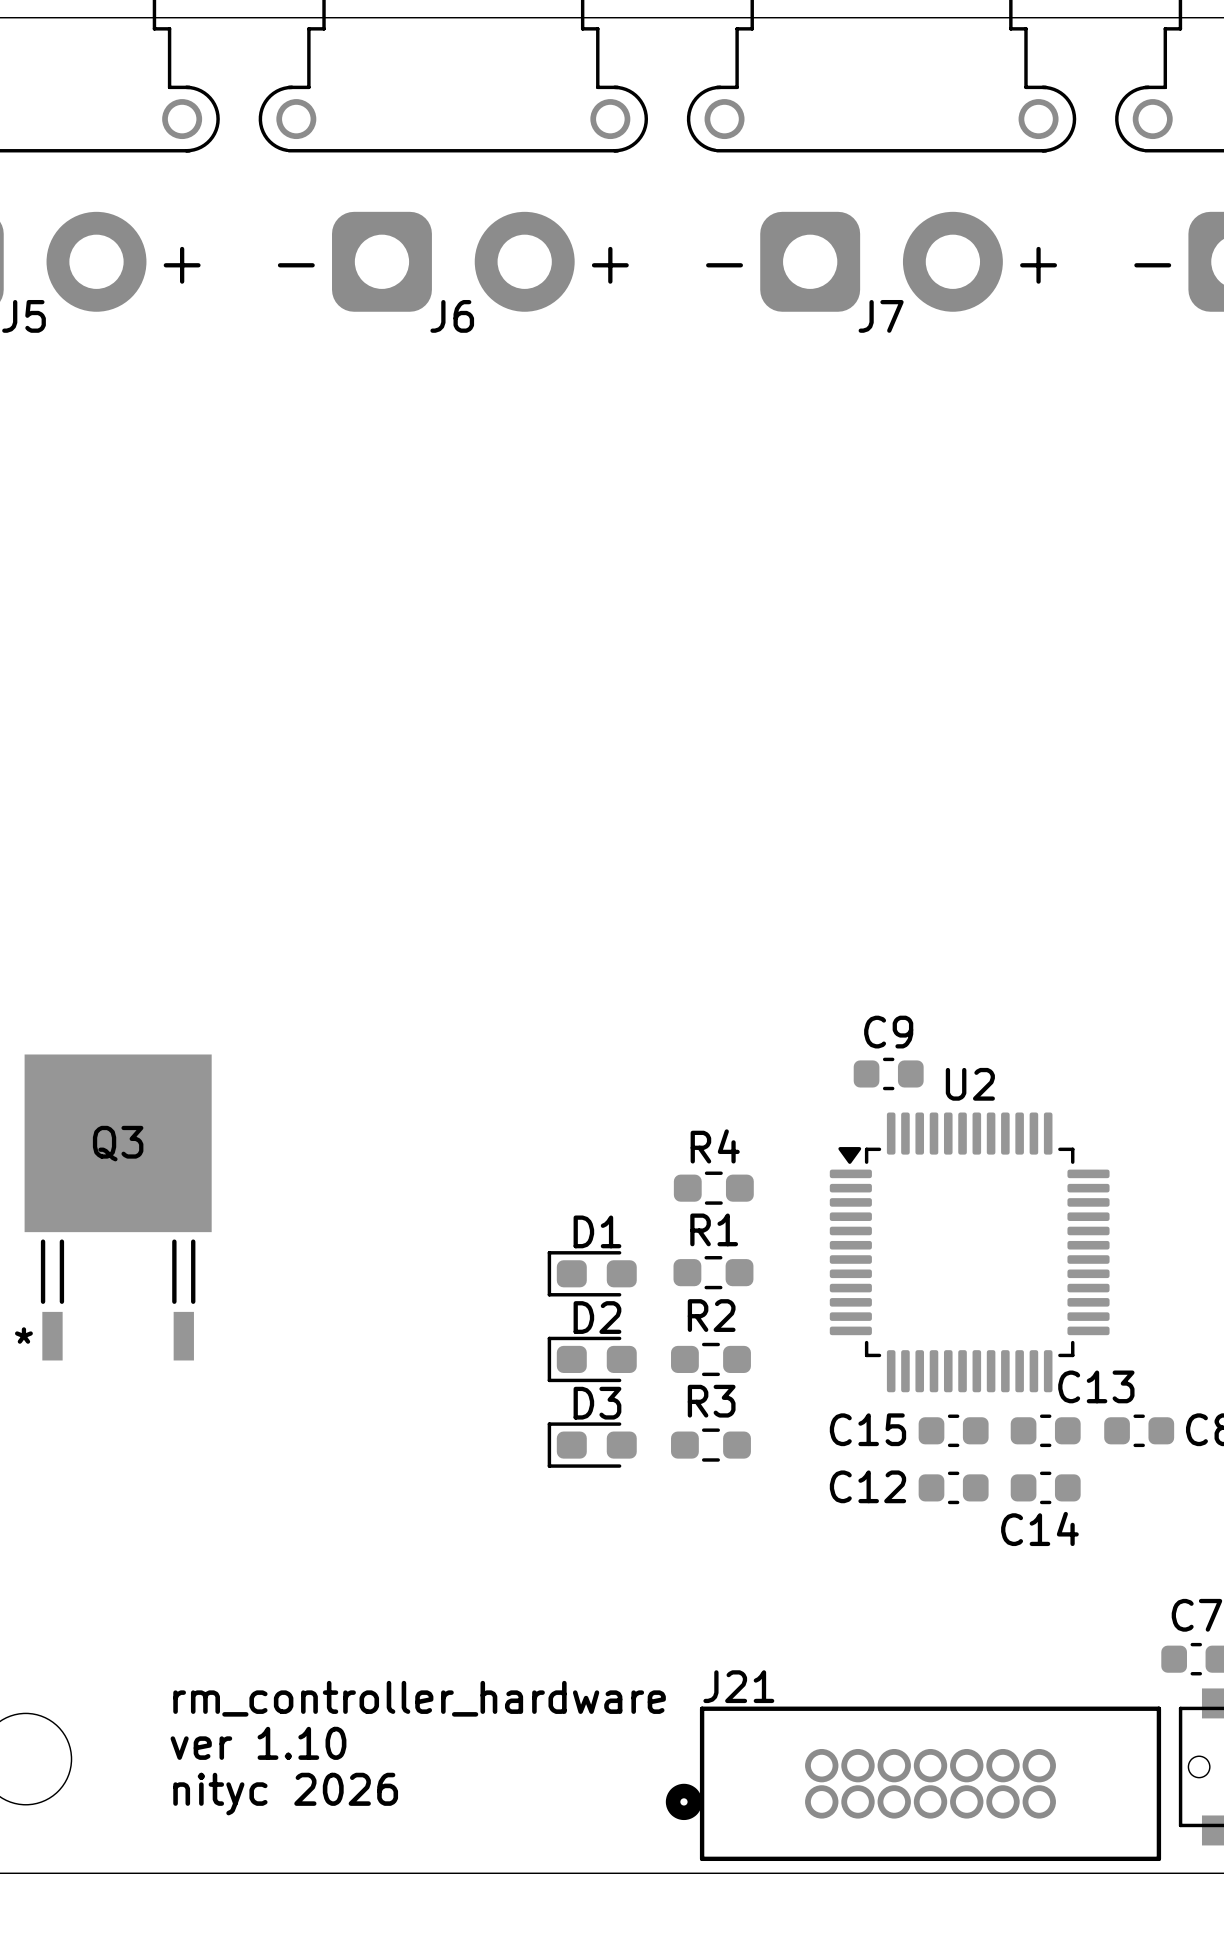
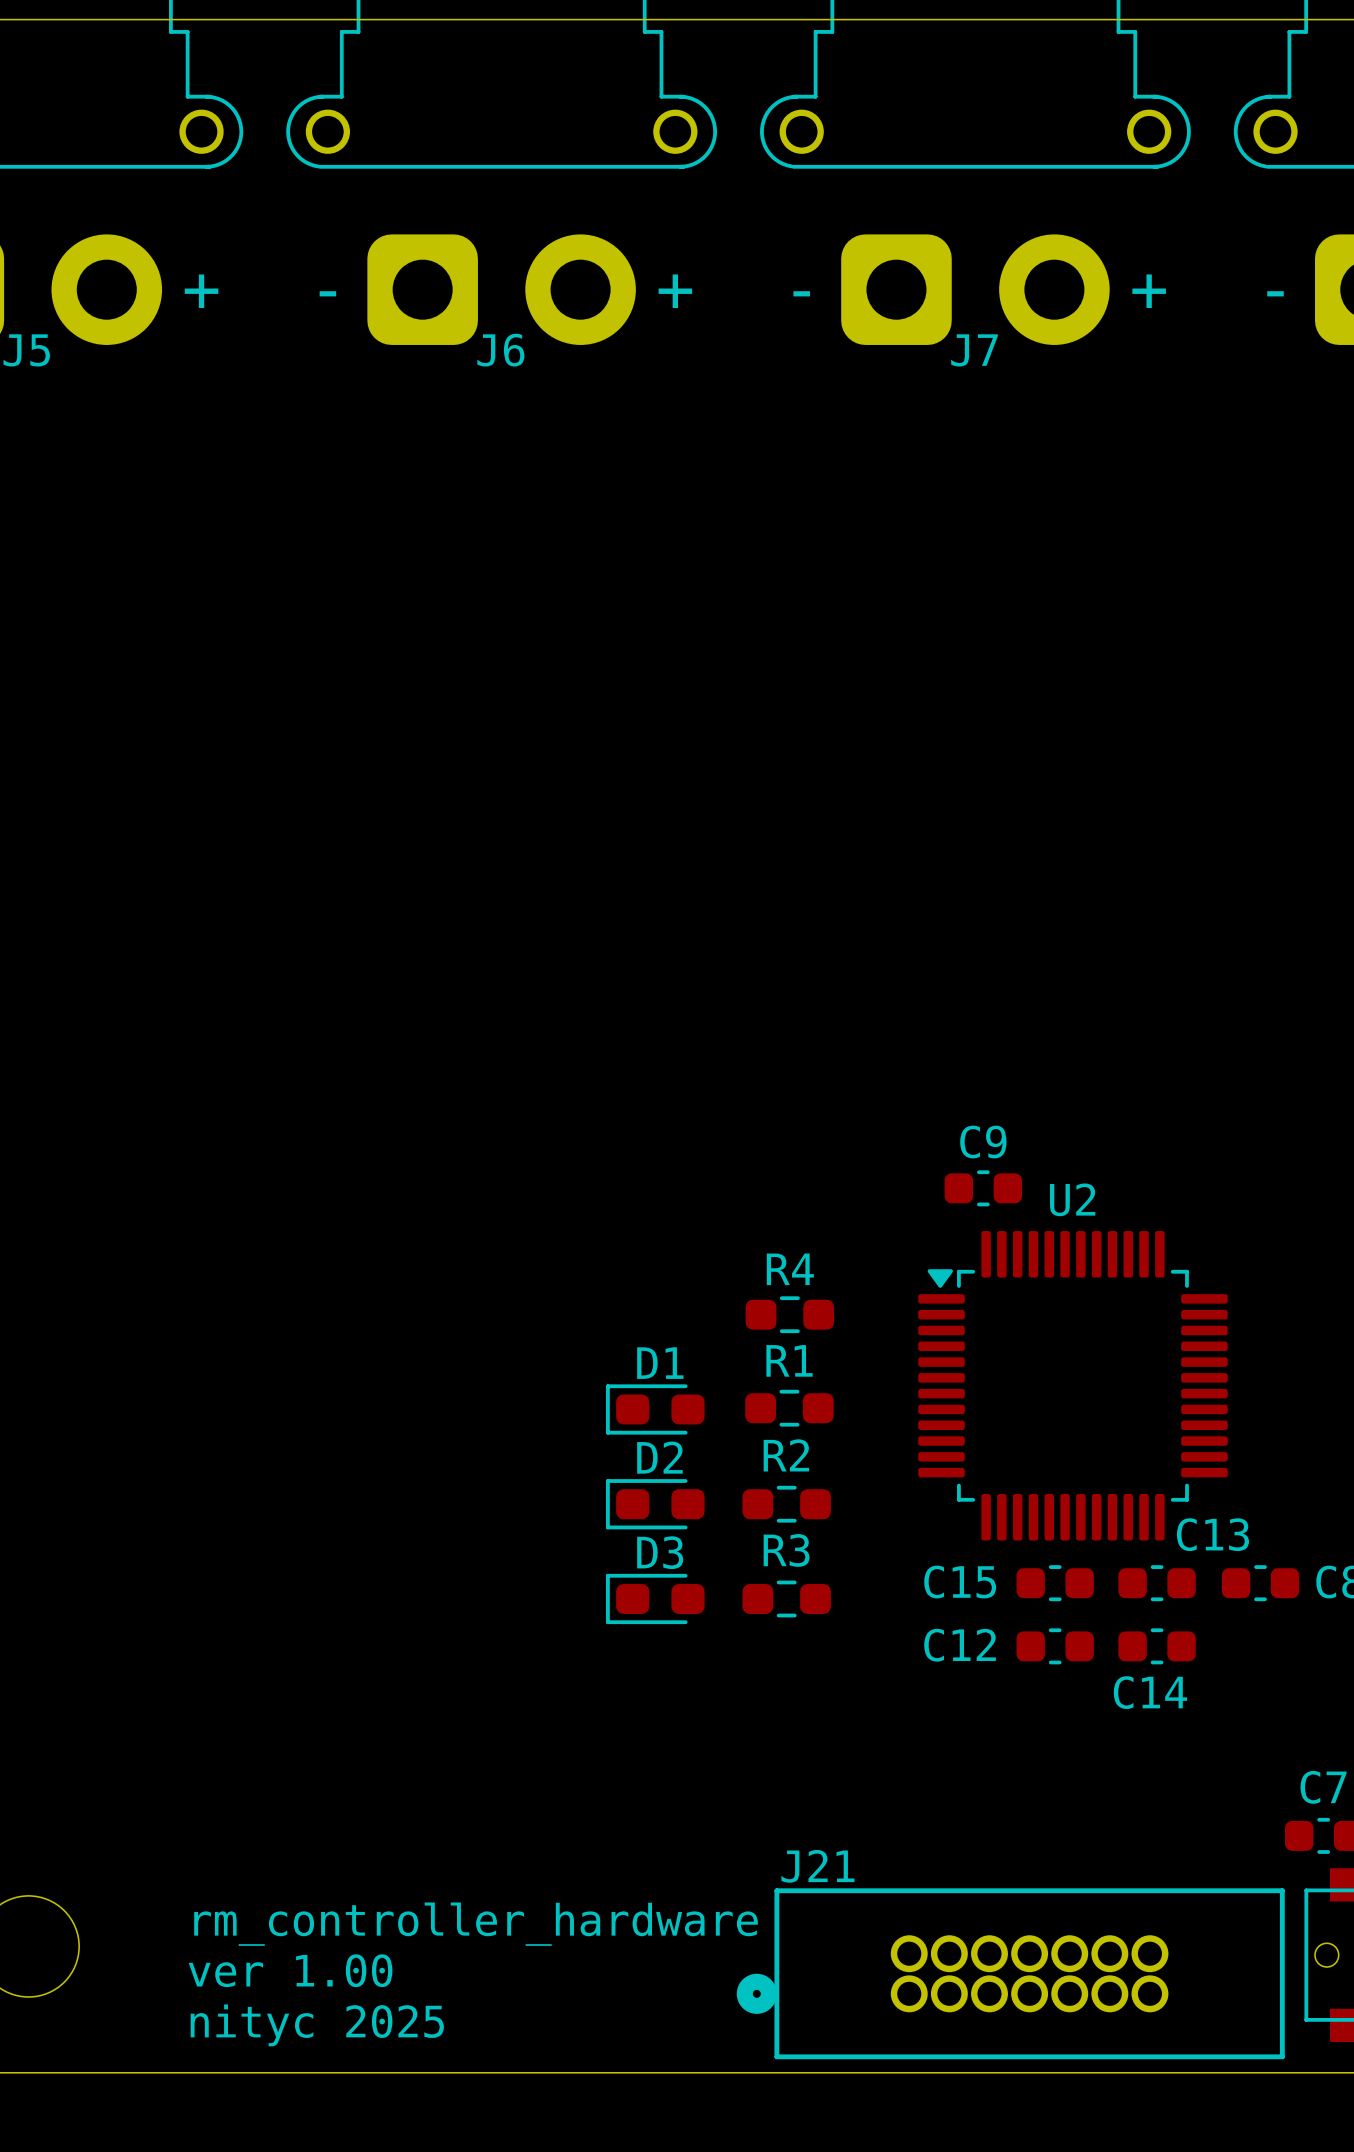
Q3: (118, 1207) -> none
text: rm_controller_hardware (419, 1698) -> none
text: ver 1.10 (258, 1743) -> rm_controller_hardware (476, 1924)
text: nityc 2026 (285, 1794) -> ver 1.00 (290, 1970)
text: none -> nityc 2025 (317, 2025)

